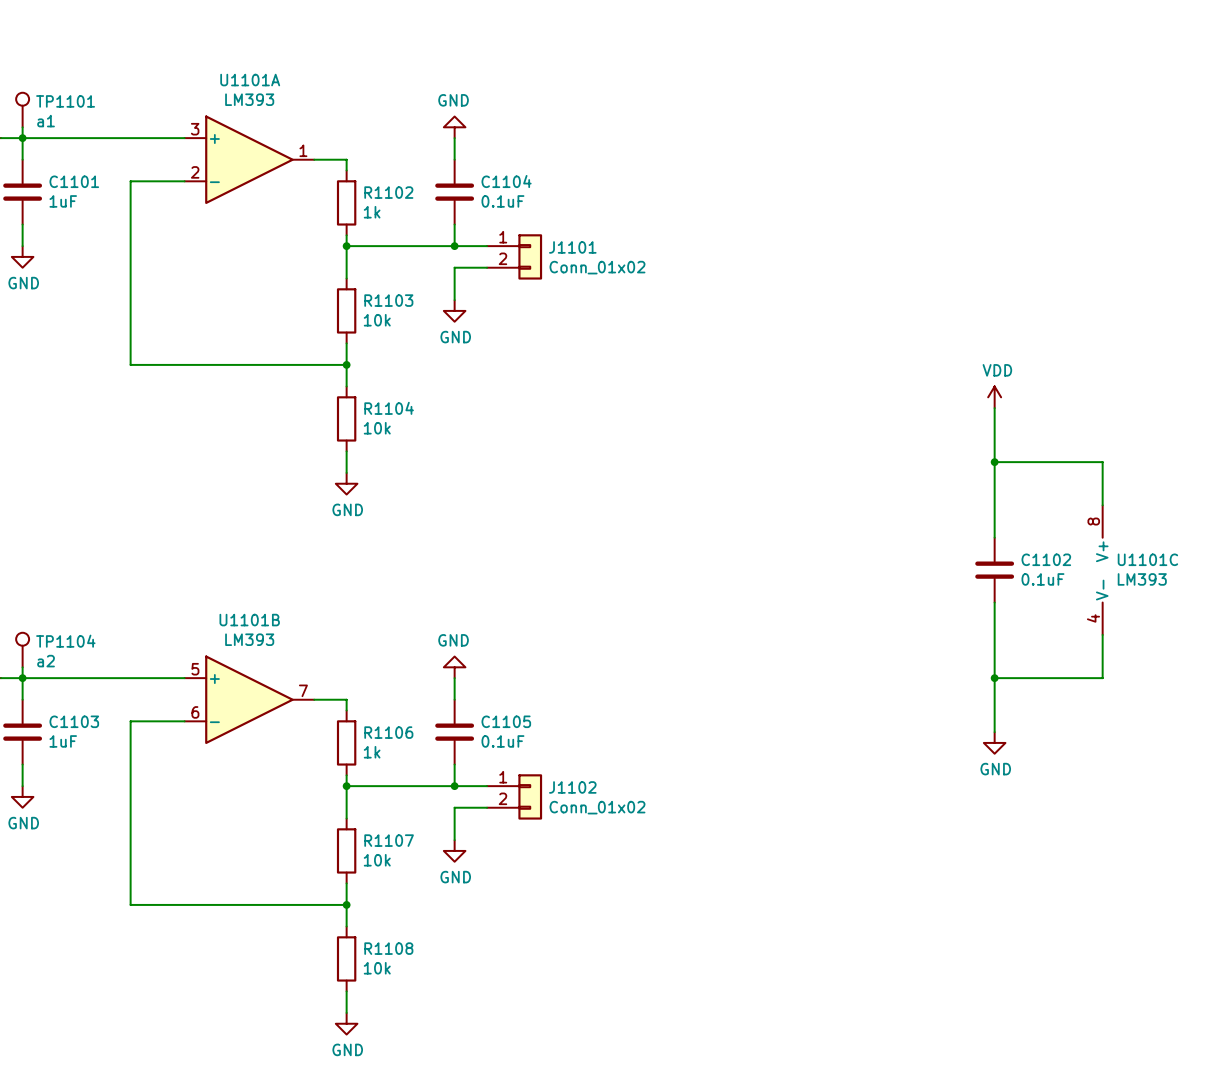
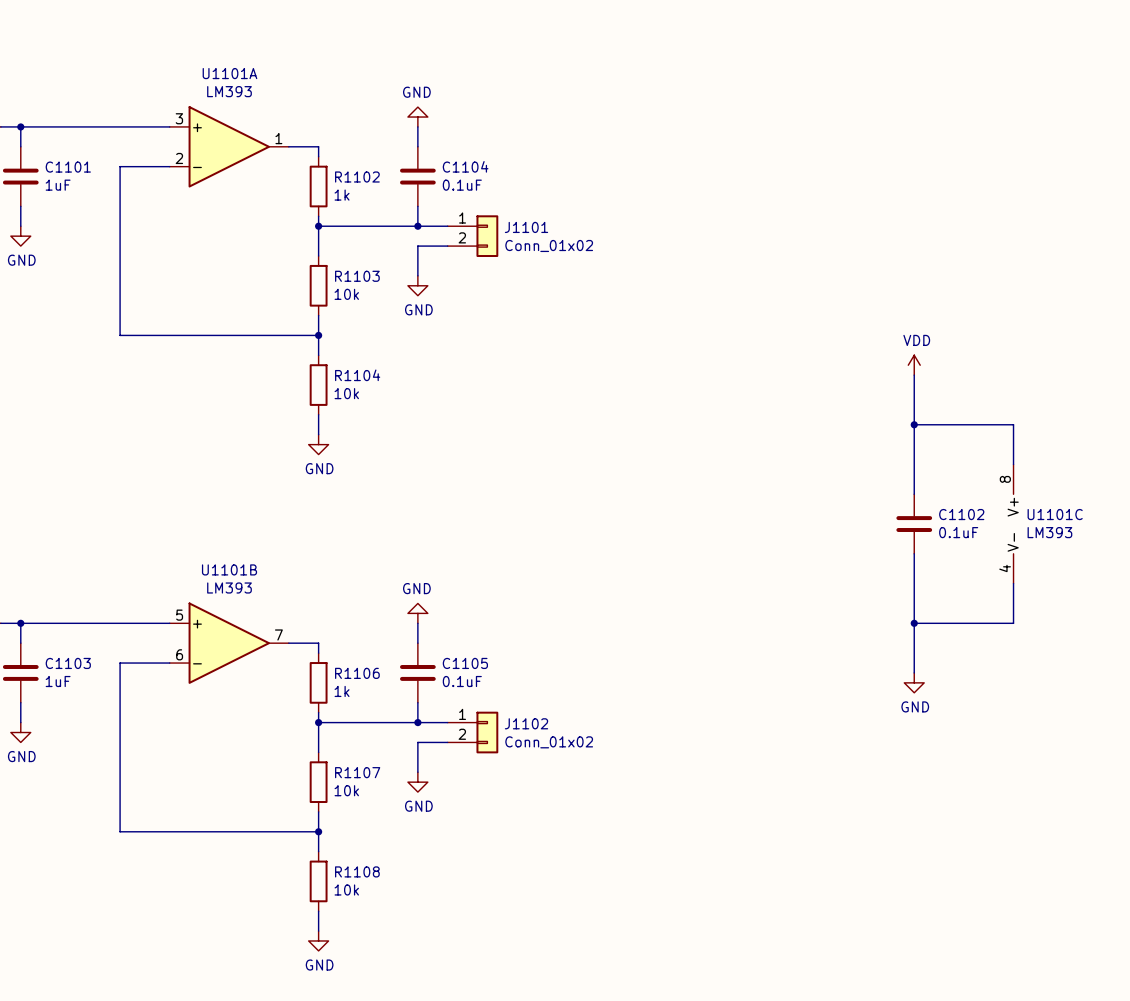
TP1101: a1 (22, 110) -> none
wire: (22, 127) (22, 138) -> none
TP1104: a2 (22, 650) -> none
wire: (22, 667) (22, 678) -> none

